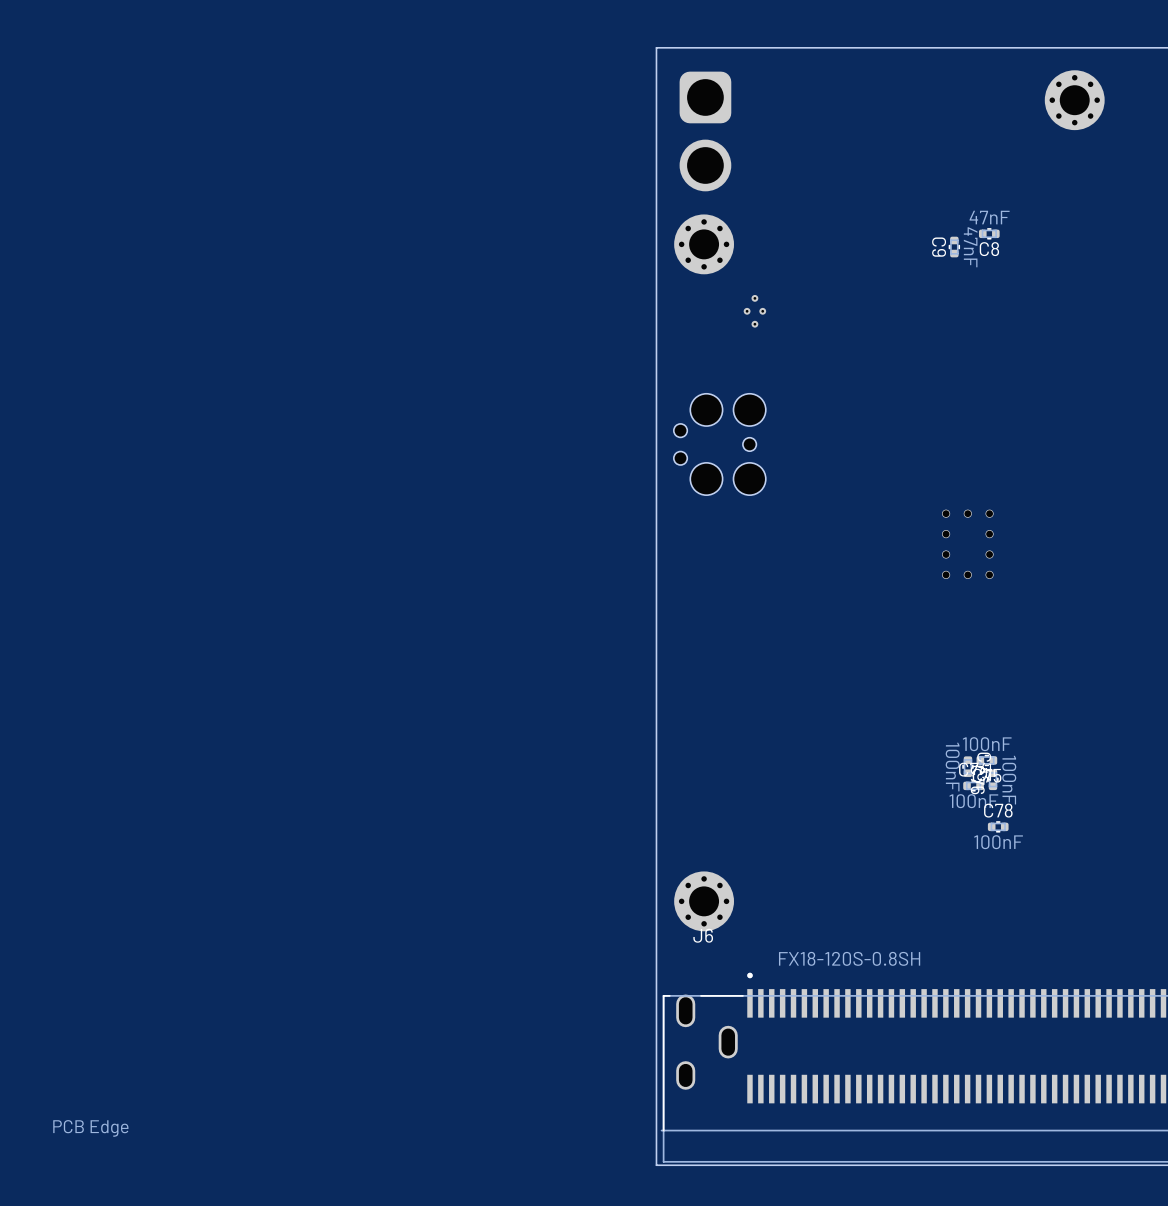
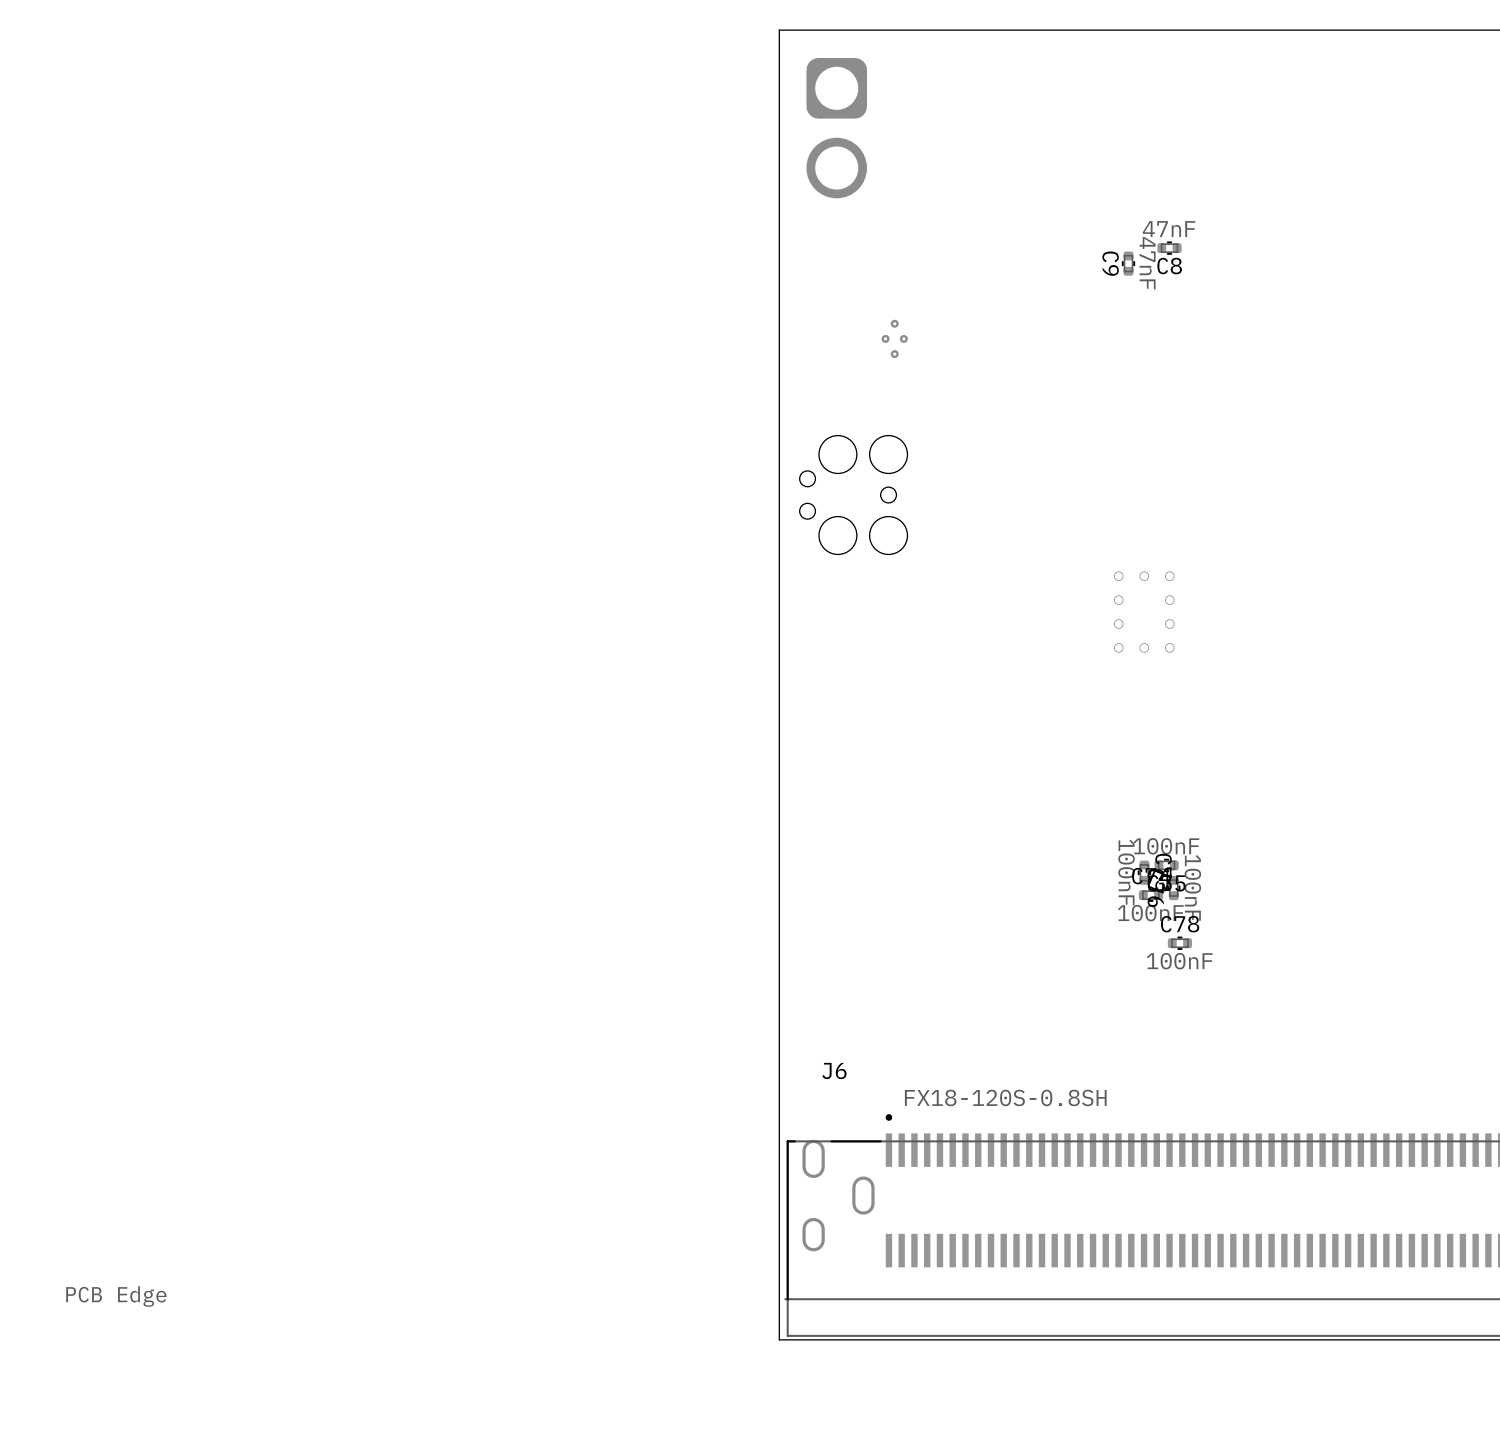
part: (1074, 100) -> none
part: (704, 244) -> none
part: (704, 901) -> none

